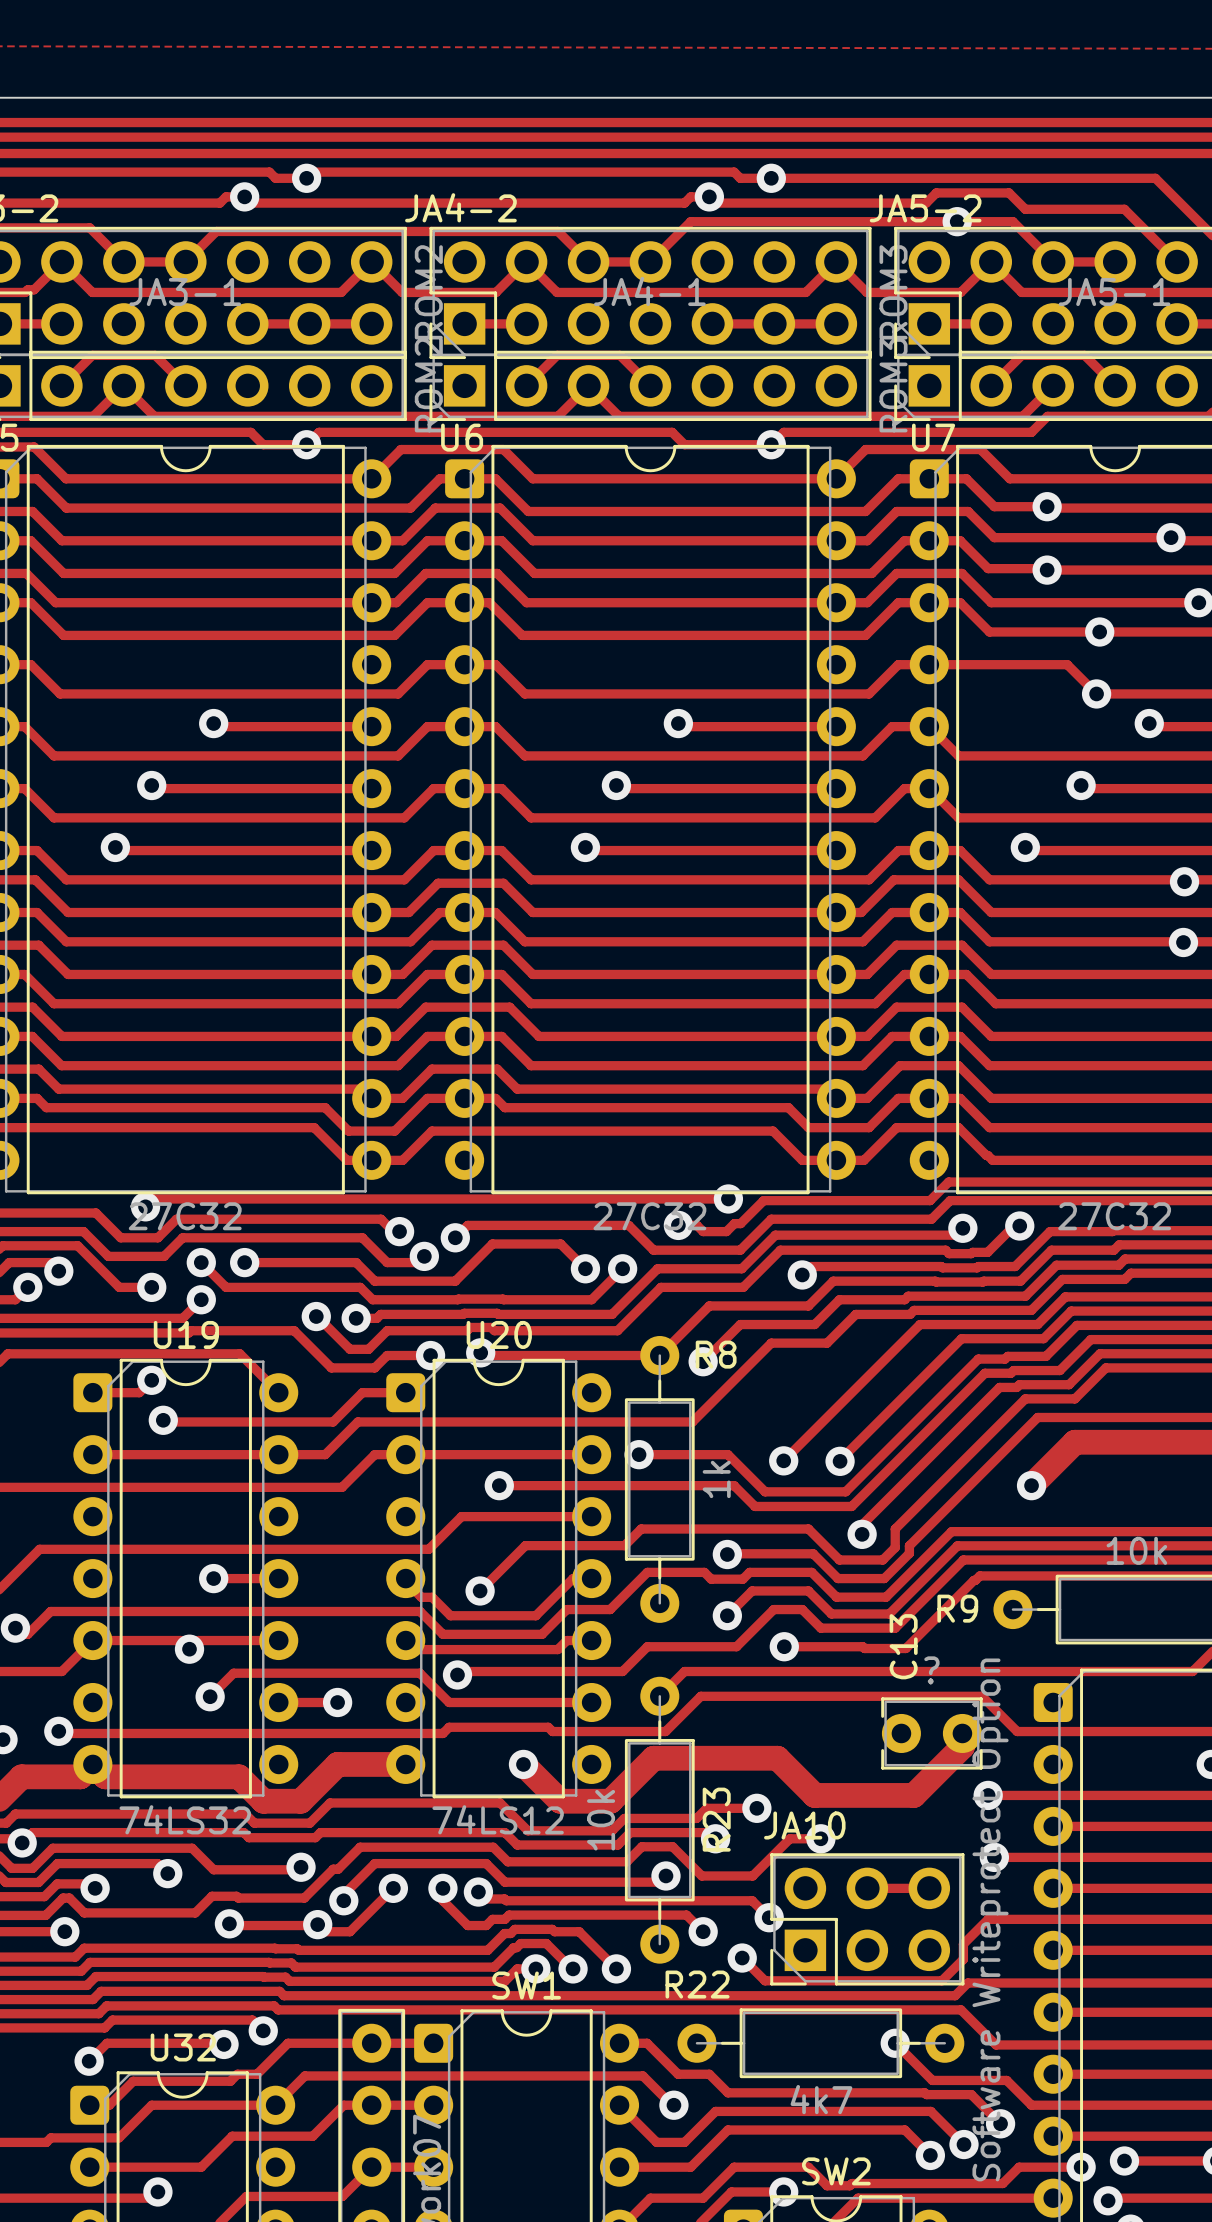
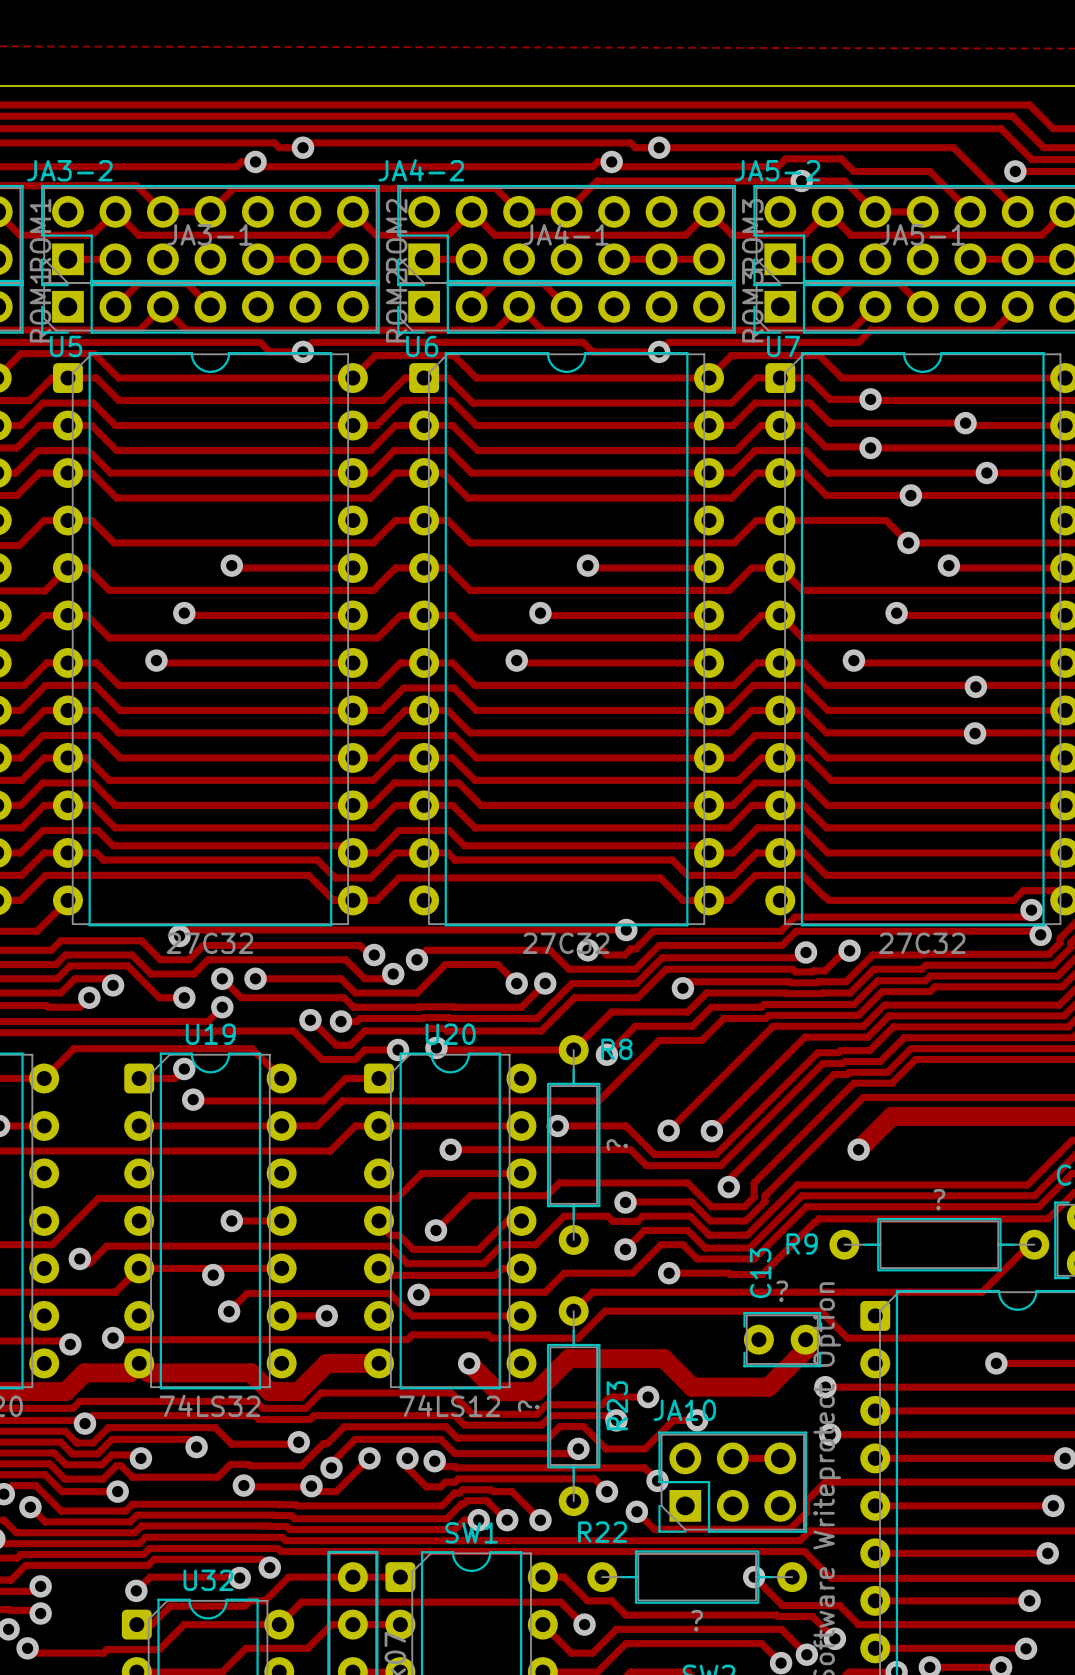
R8 value: 1k (716, 1479) -> ? (617, 1144)
R9 value: 10k (1136, 1550) -> ? (939, 1199)
R23 value: 10k (601, 1820) -> ? (528, 1406)
R22 value: 4k7 (821, 2099) -> ? (697, 1620)

